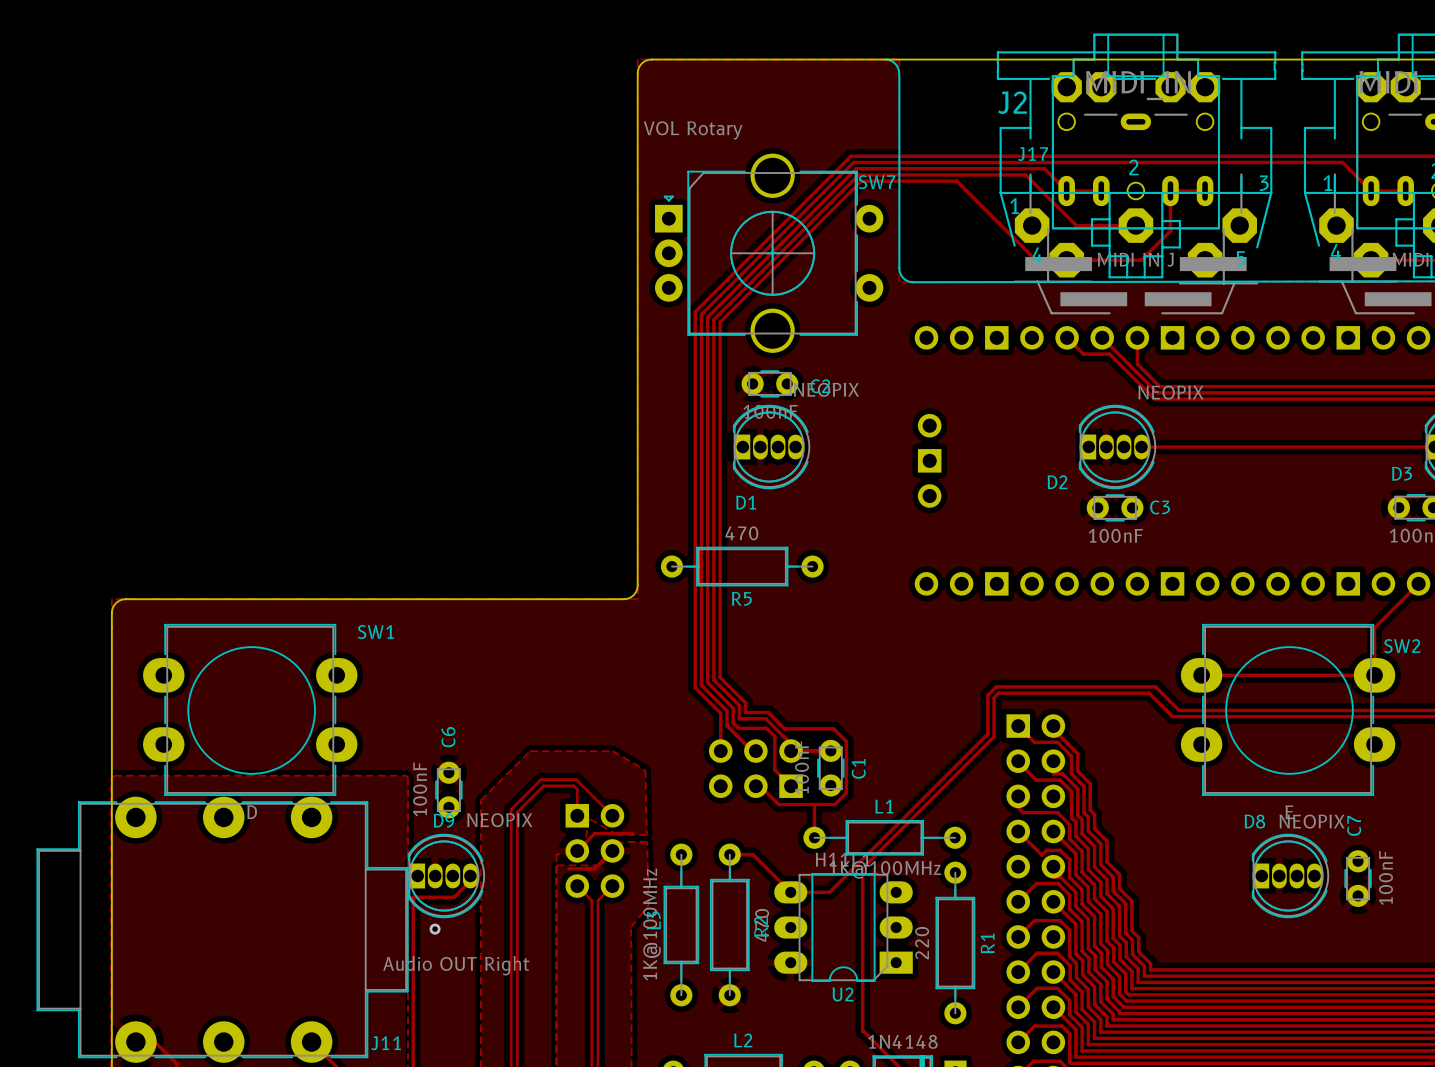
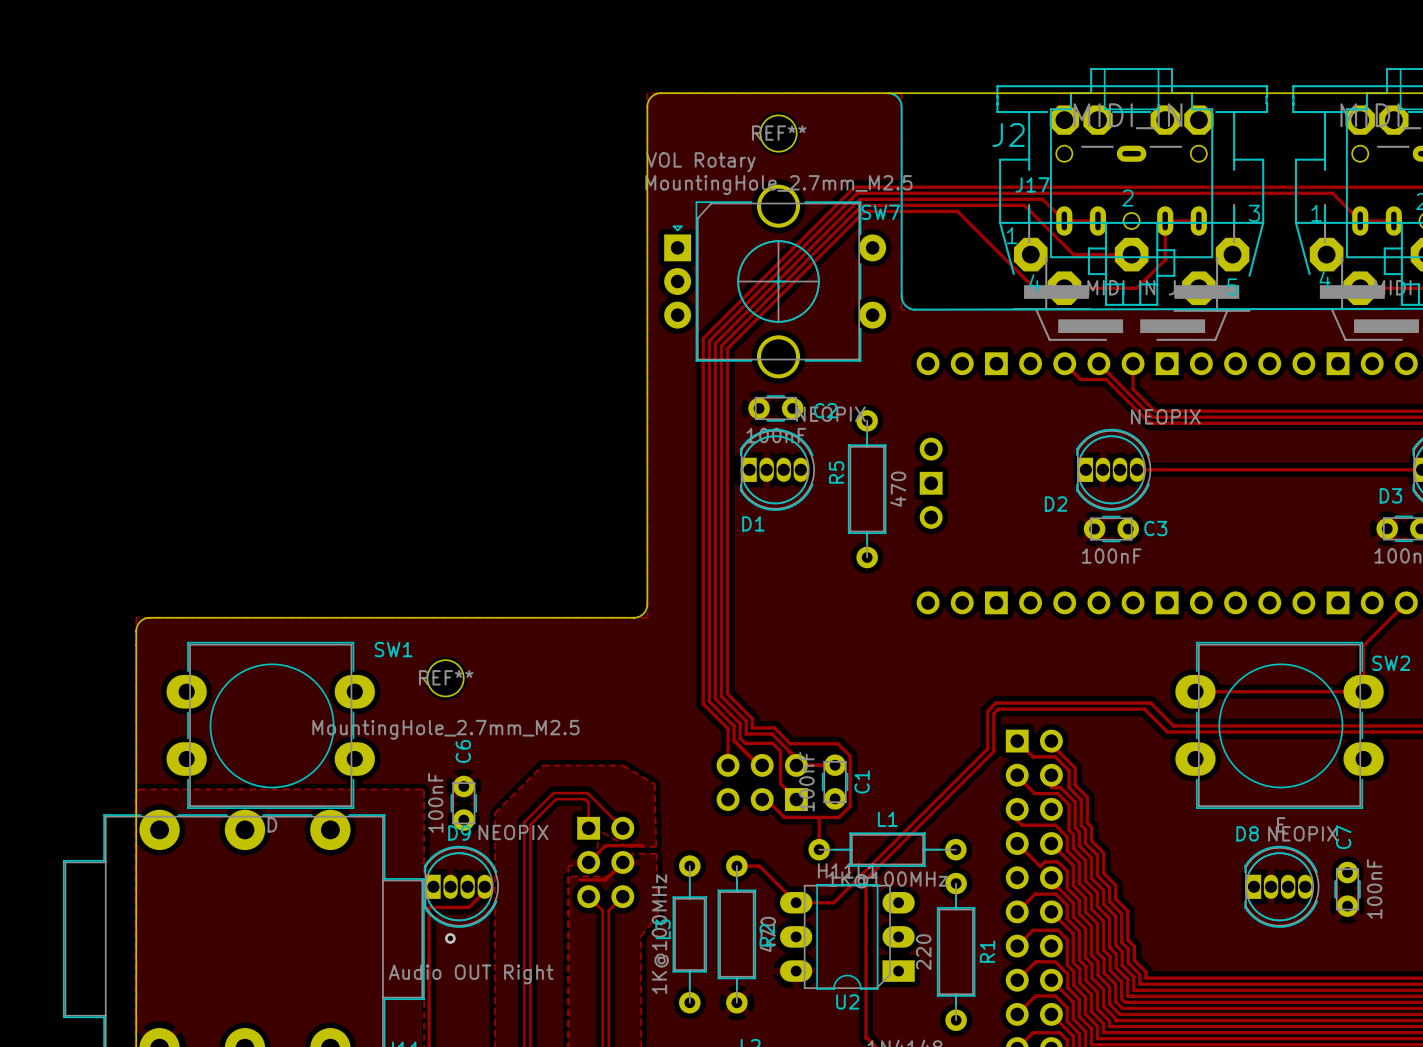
REF**: none -> MountingHole_2.7mm_M2.5 (778, 133)
R5 rotation: 0° (742, 566) -> 90° clockwise (867, 489)
R5 position: (742, 566) -> (867, 489)
REF**: none -> MountingHole_2.7mm_M2.5 (445, 678)

